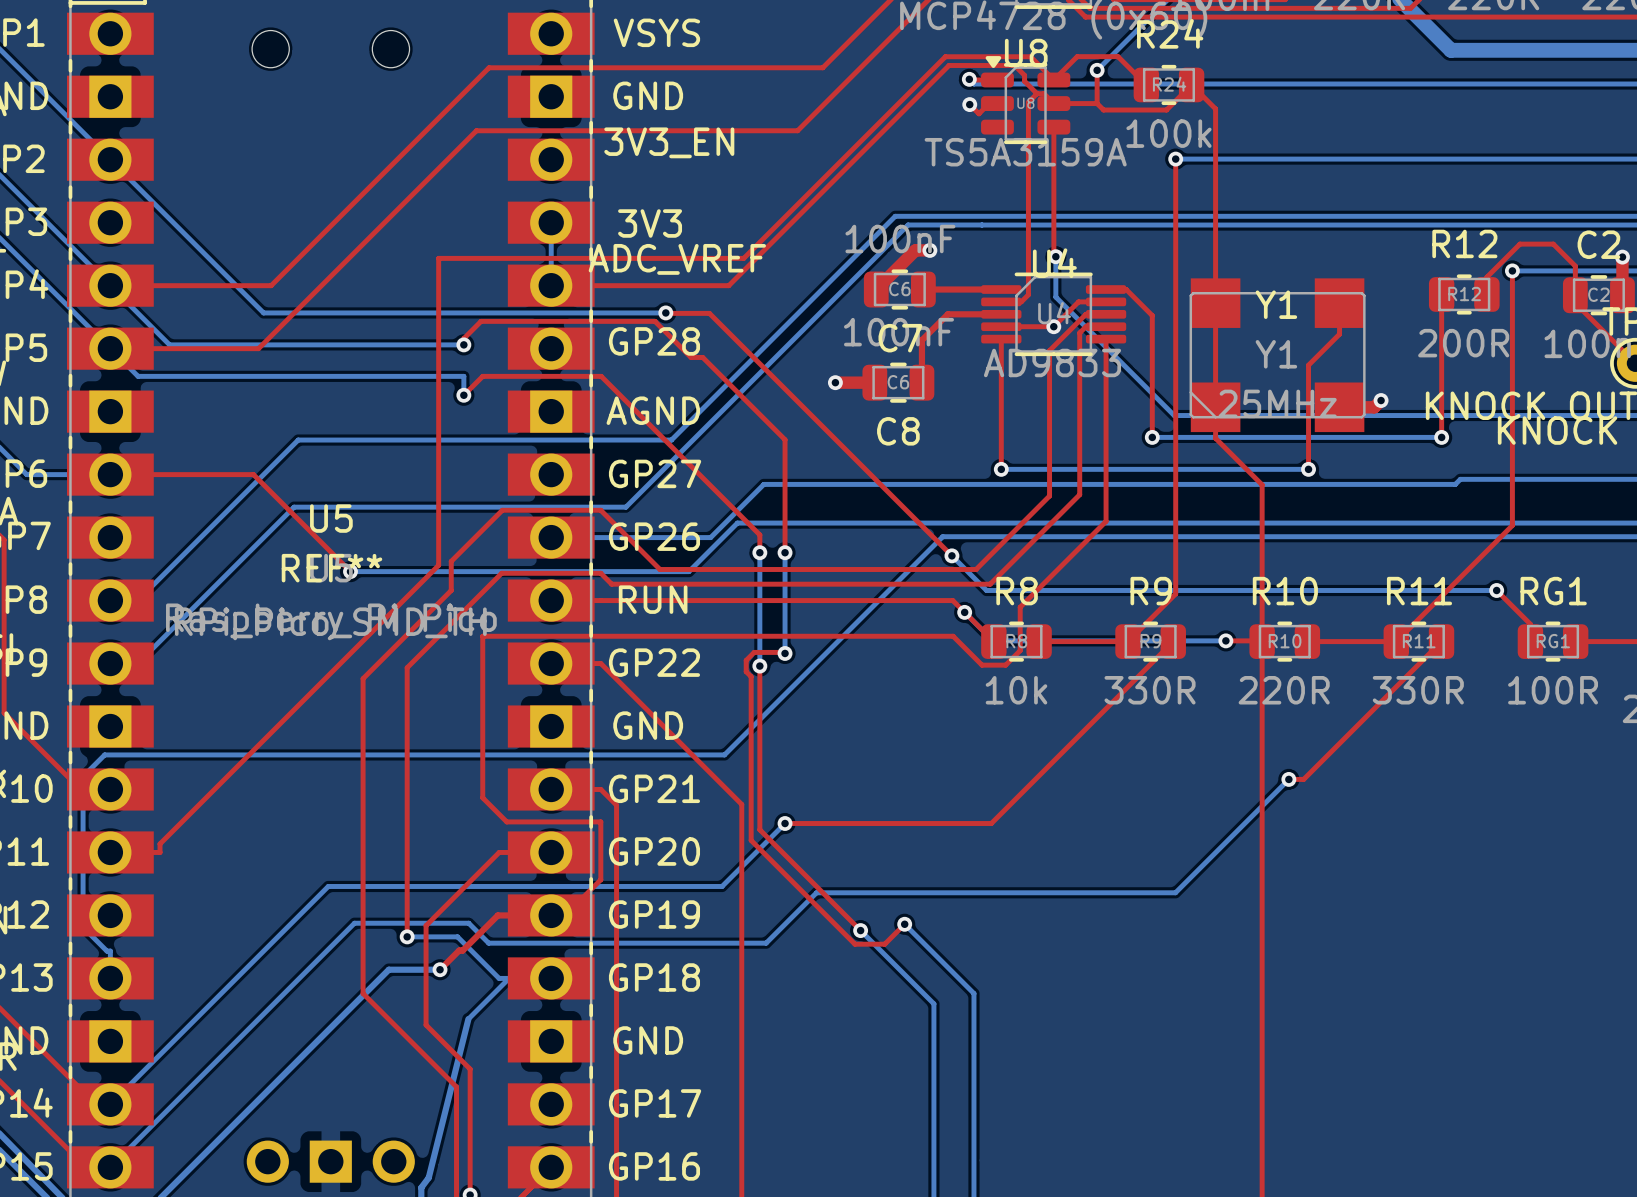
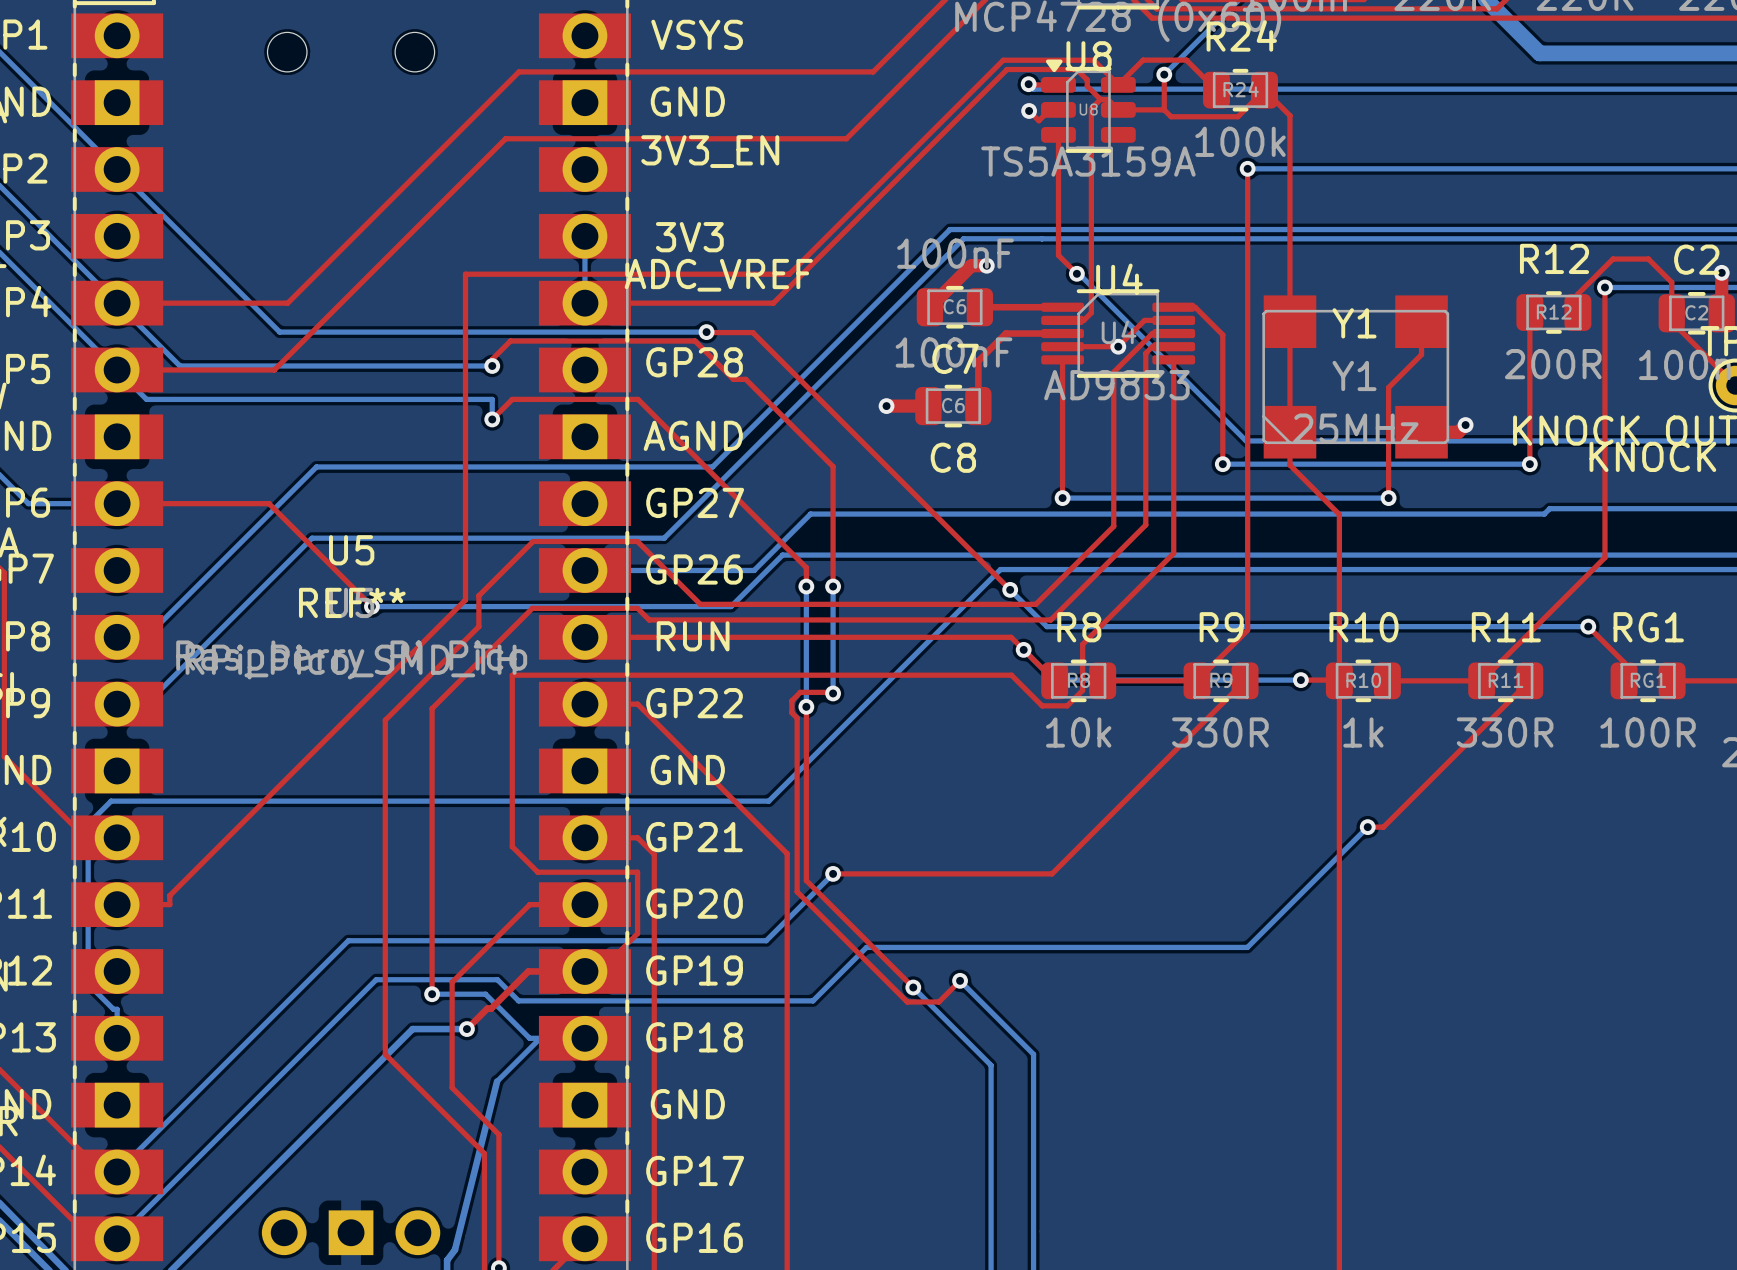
top track: none -> (1058, 134) (1058, 255) (1076, 273)
top track: (1053, 127) (1053, 254) (1055, 256) -> none
bottom track: (1055, 256) (1055, 297) -> (1076, 273) (1120, 315)
via position: (1055, 256) -> (1076, 273)
R10 value: 220R (1284, 690) -> 1k (1363, 732)

